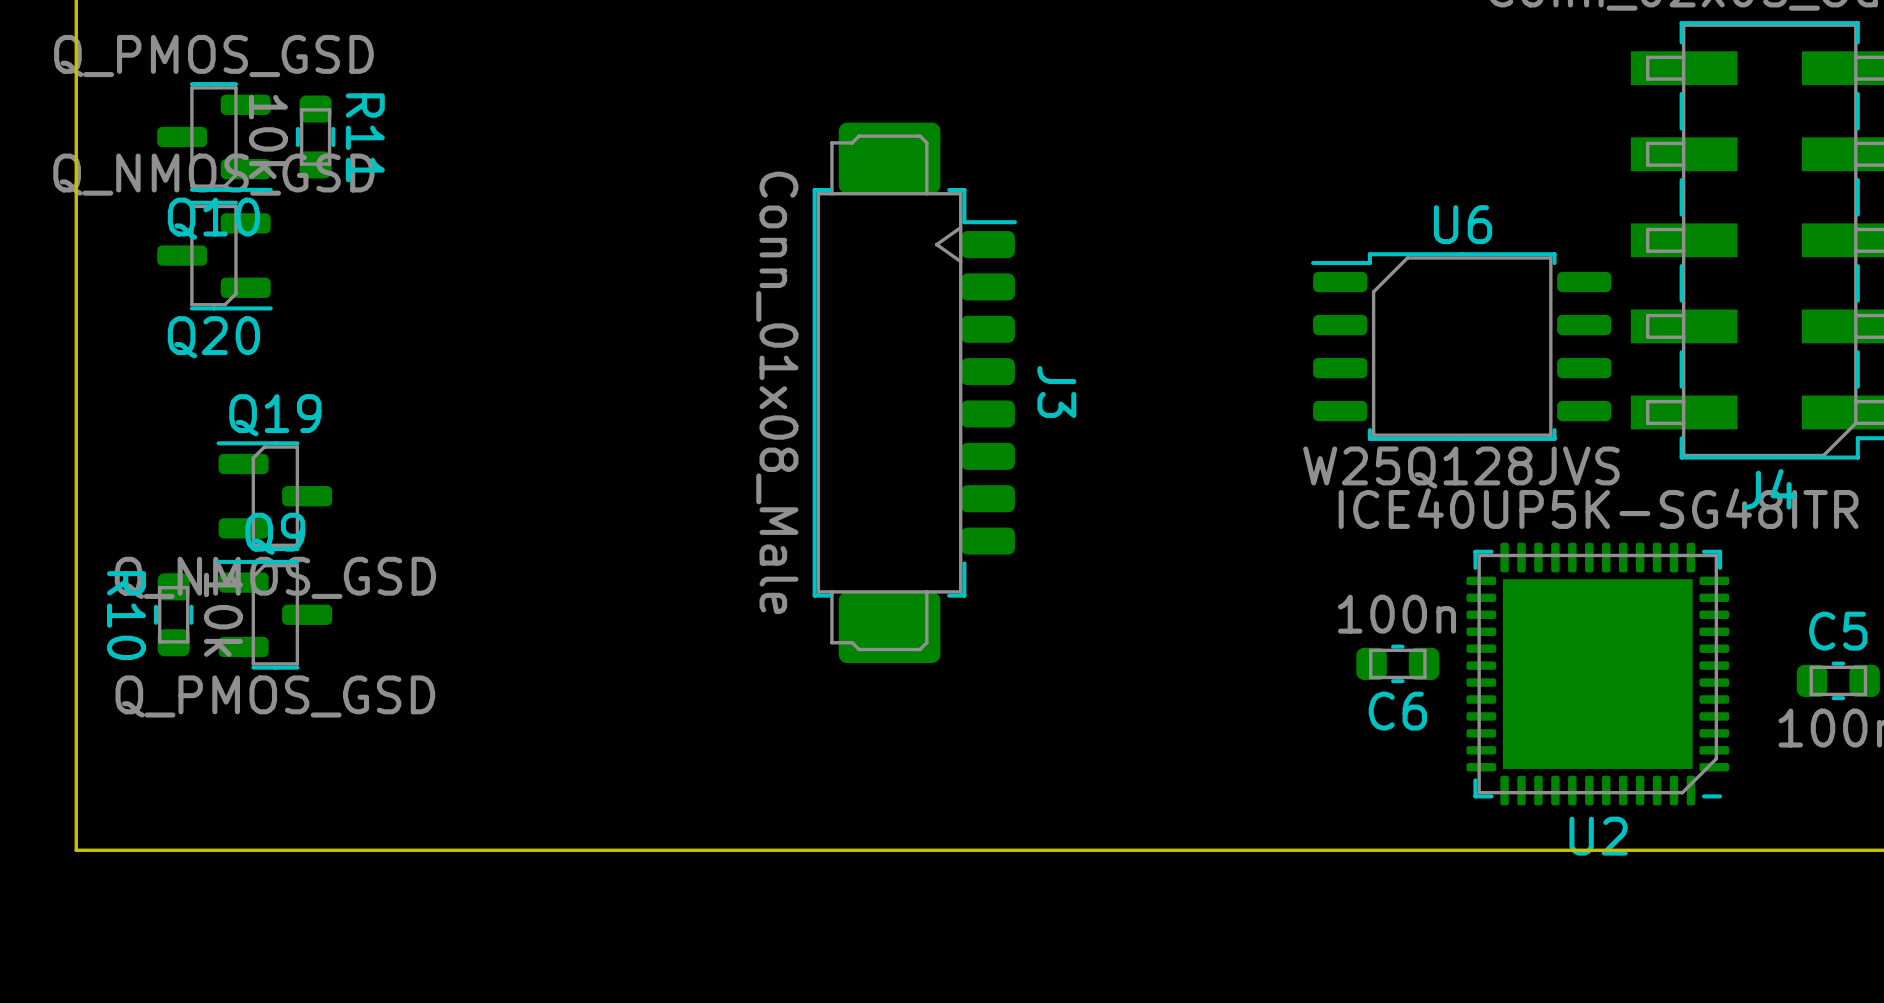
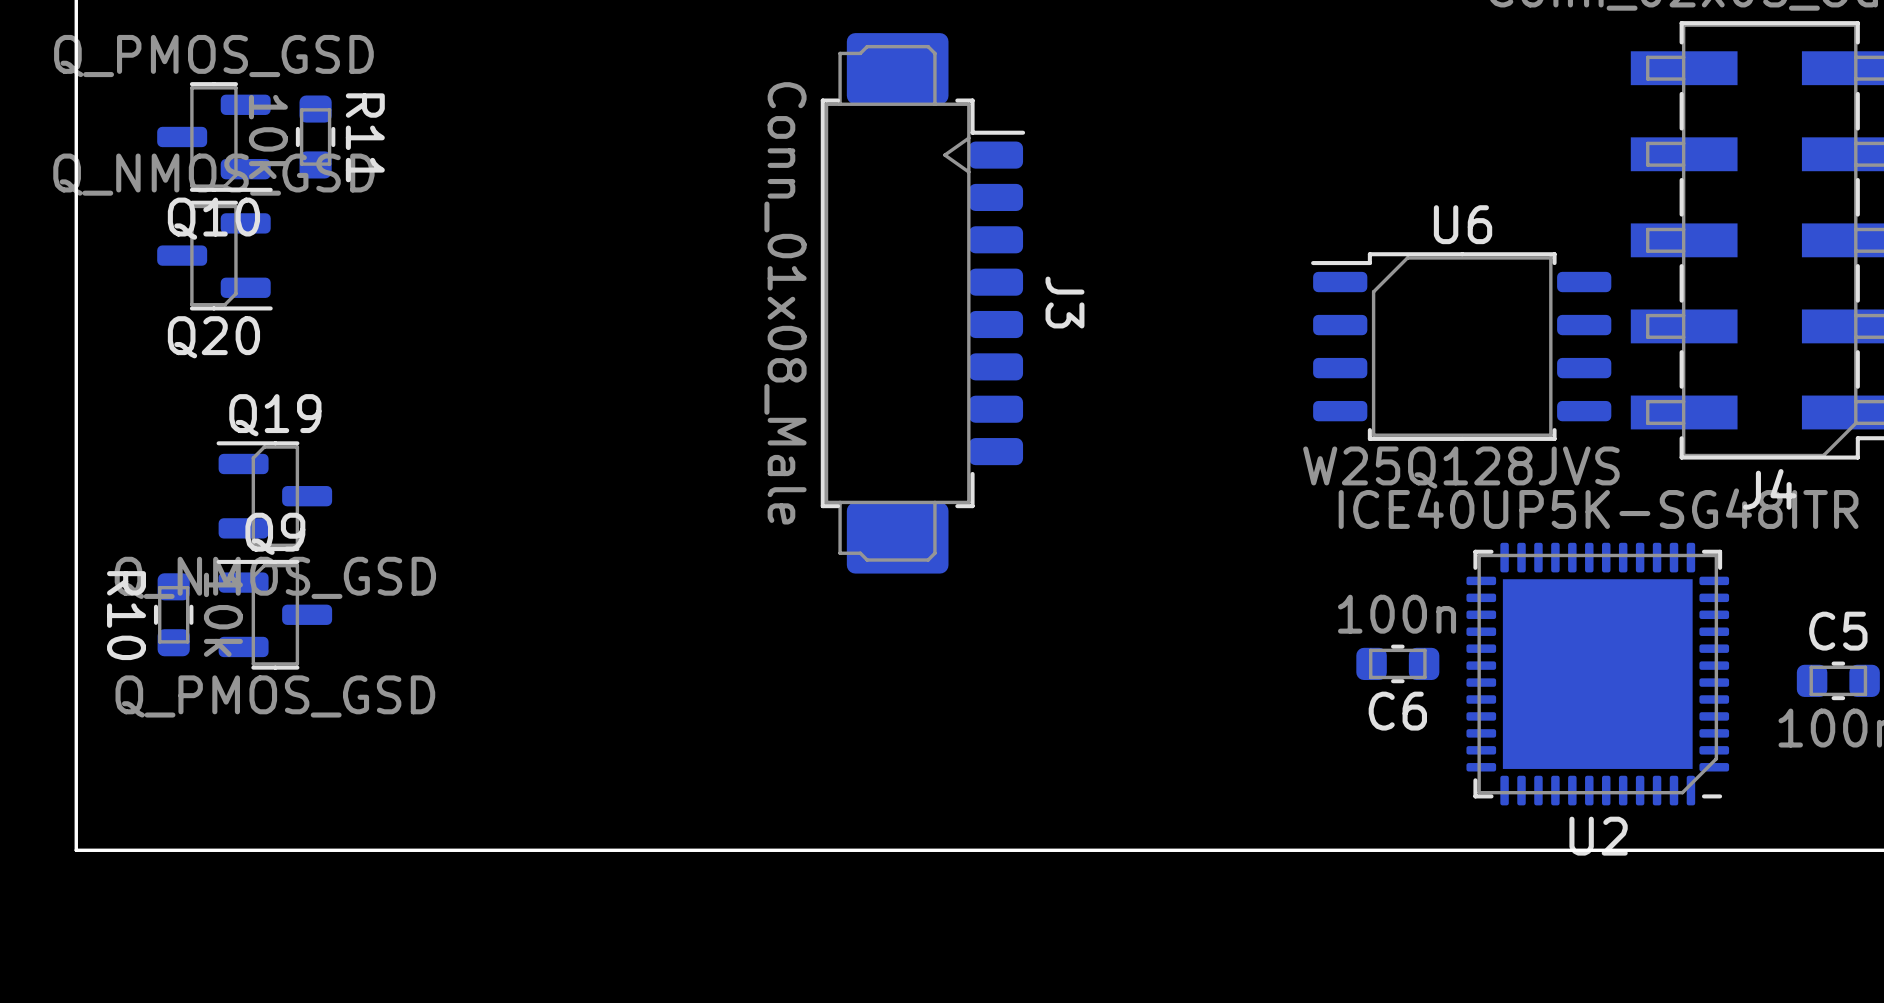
J3 position: (914, 392) -> (922, 303)

